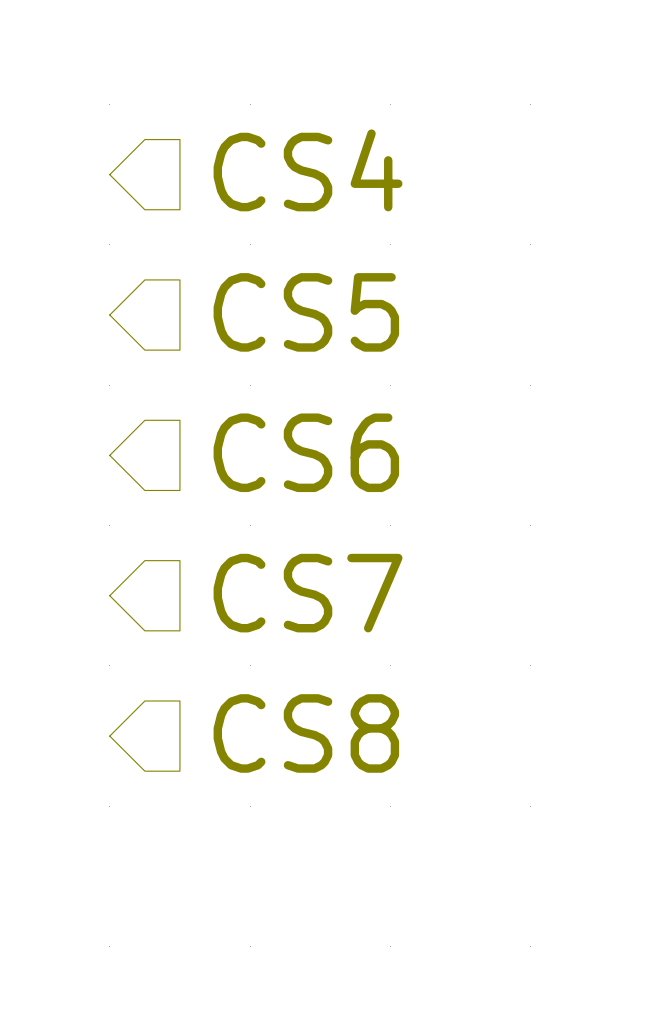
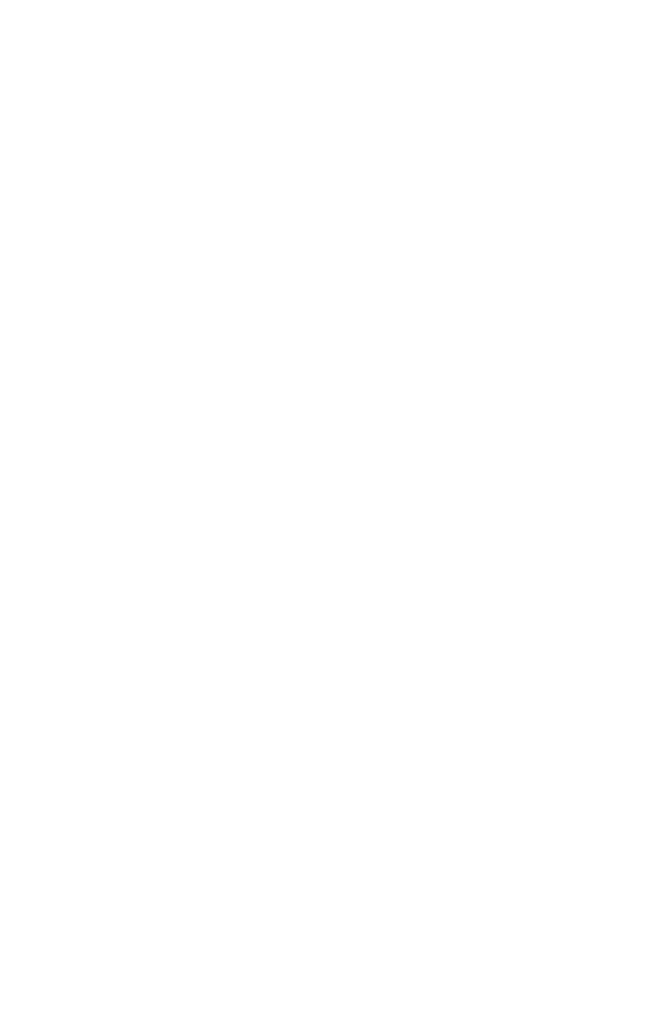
hierarchical label: CS4 (308, 170) -> none
hierarchical label: CS5 (306, 312) -> none
hierarchical label: CS6 (306, 452) -> none
hierarchical label: CS7 (308, 593) -> none
hierarchical label: CS8 (306, 733) -> none

